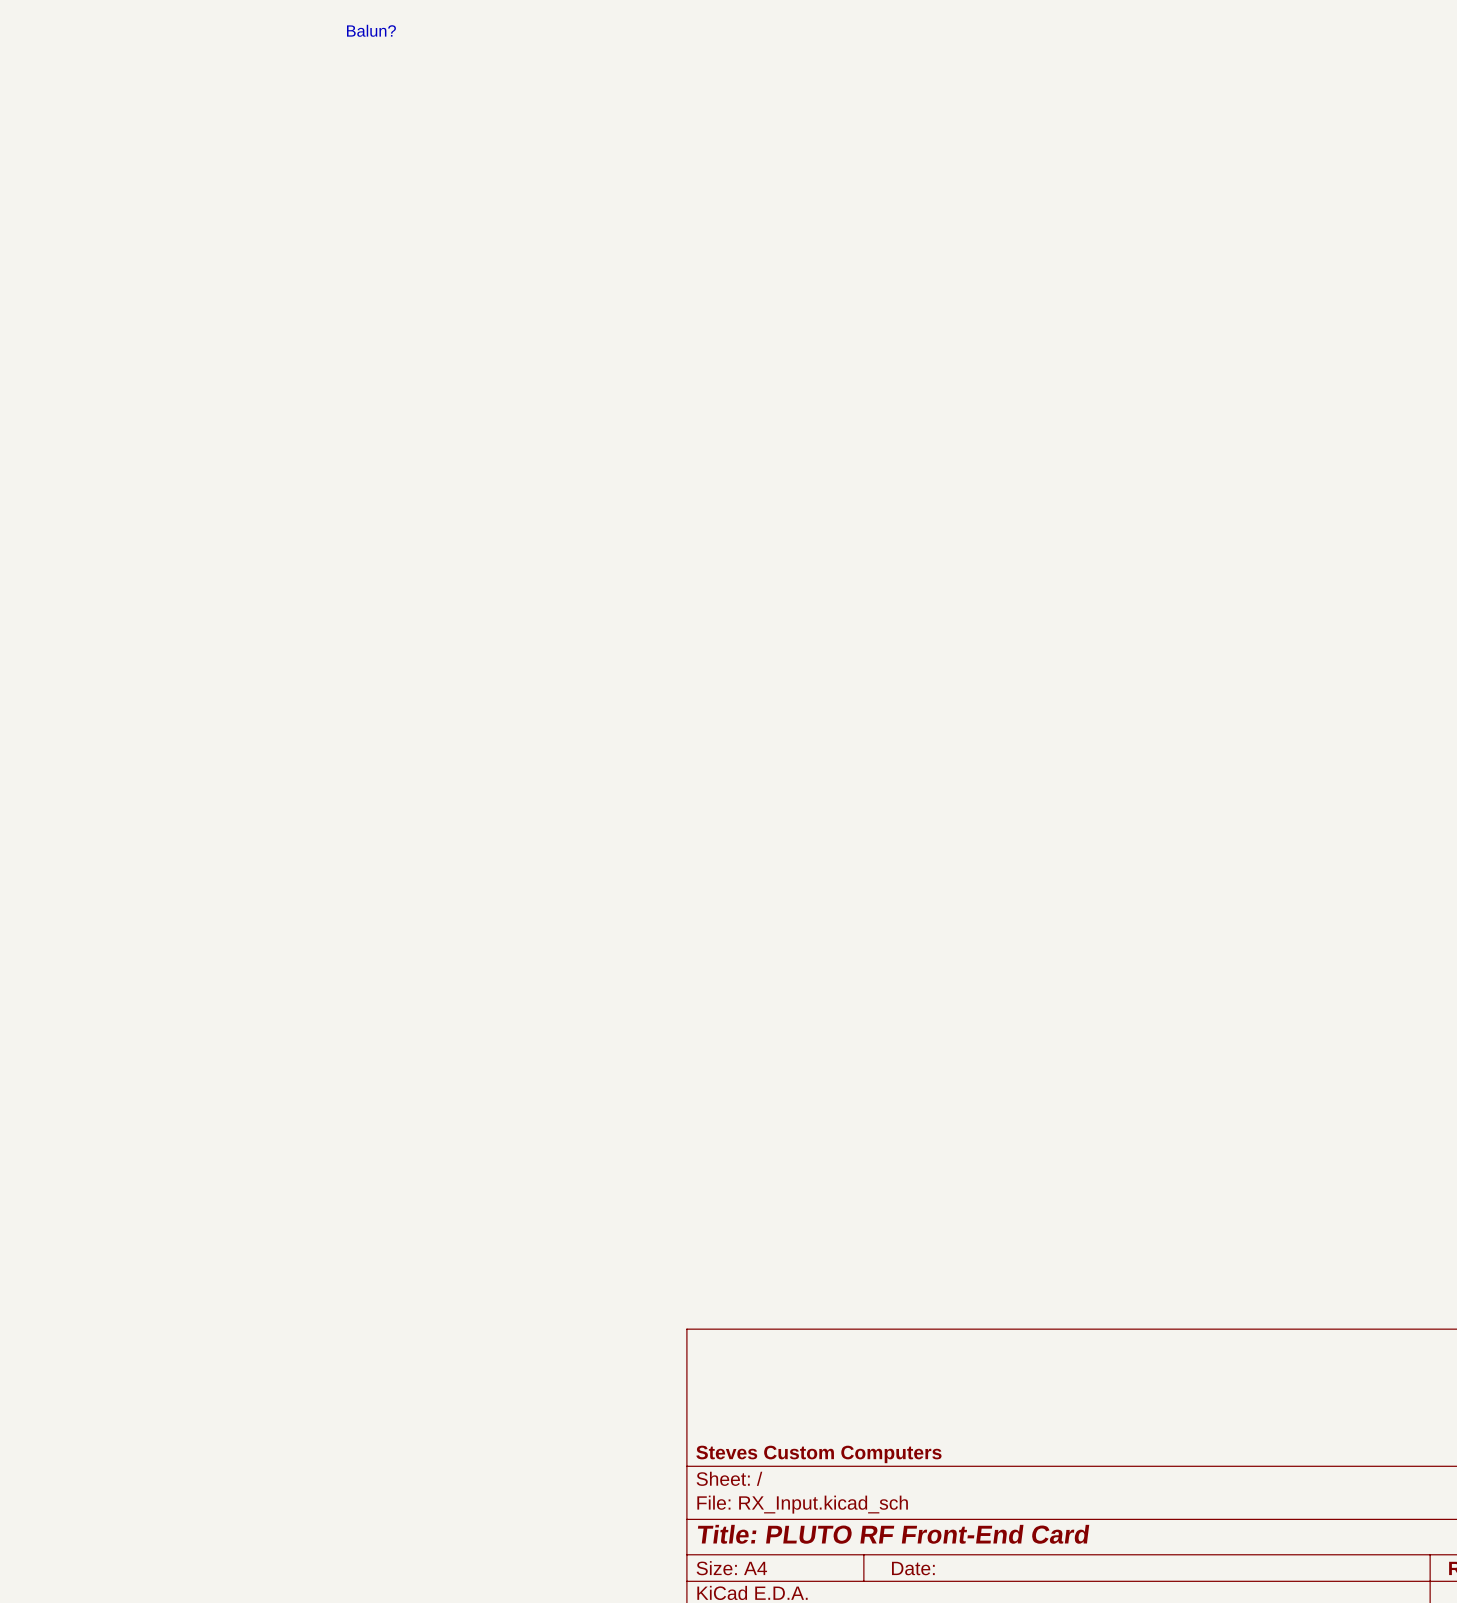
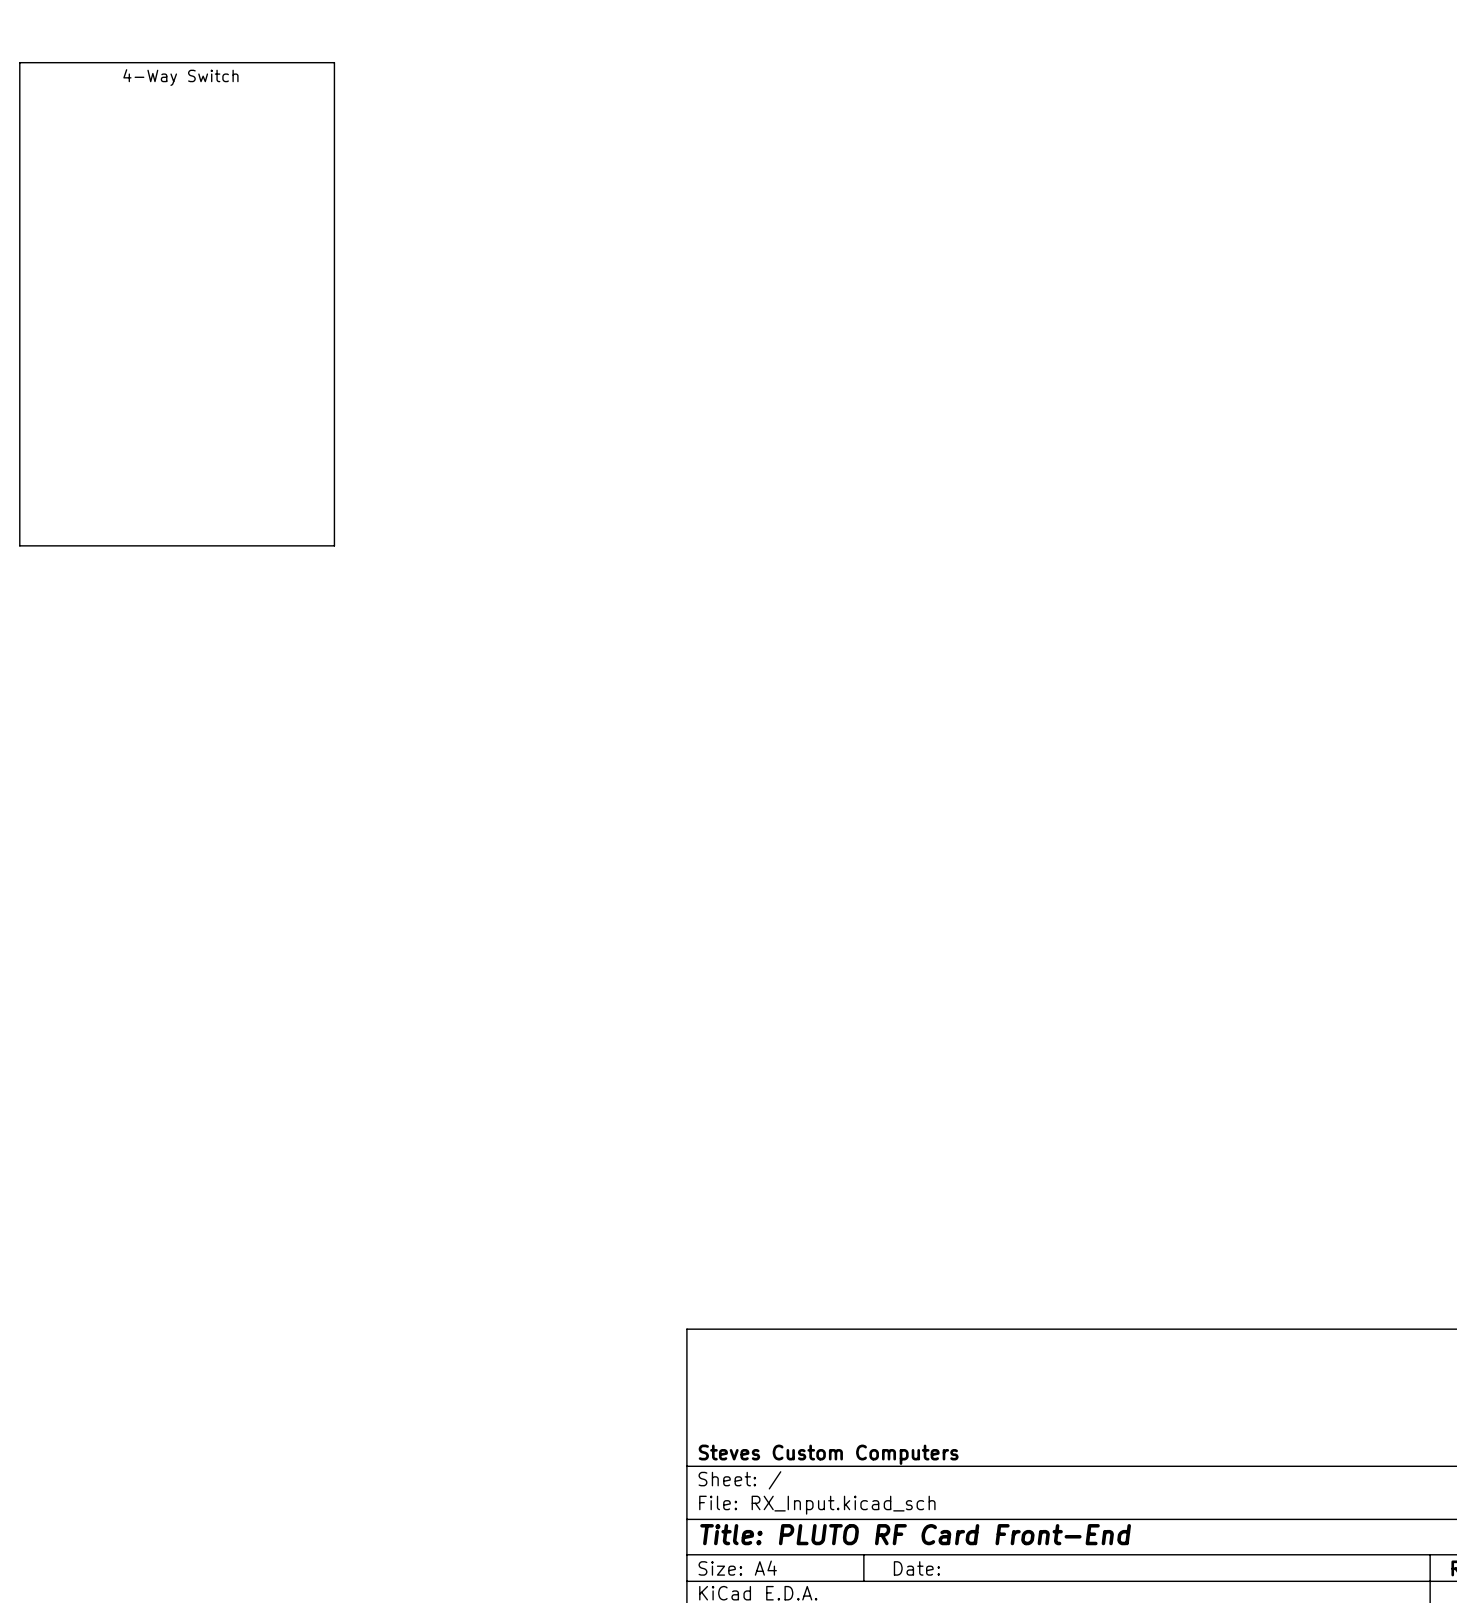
text: Balun? (371, 30) -> none
line: none -> (19, 62) (334, 62) (334, 545) (19, 545) (19, 62)
text: none -> 4-Way Switch (180, 77)
title block: Title: PLUTO RF Front-End Card (893, 1534) -> Title: PLUTO RF Card Front-End (915, 1534)

